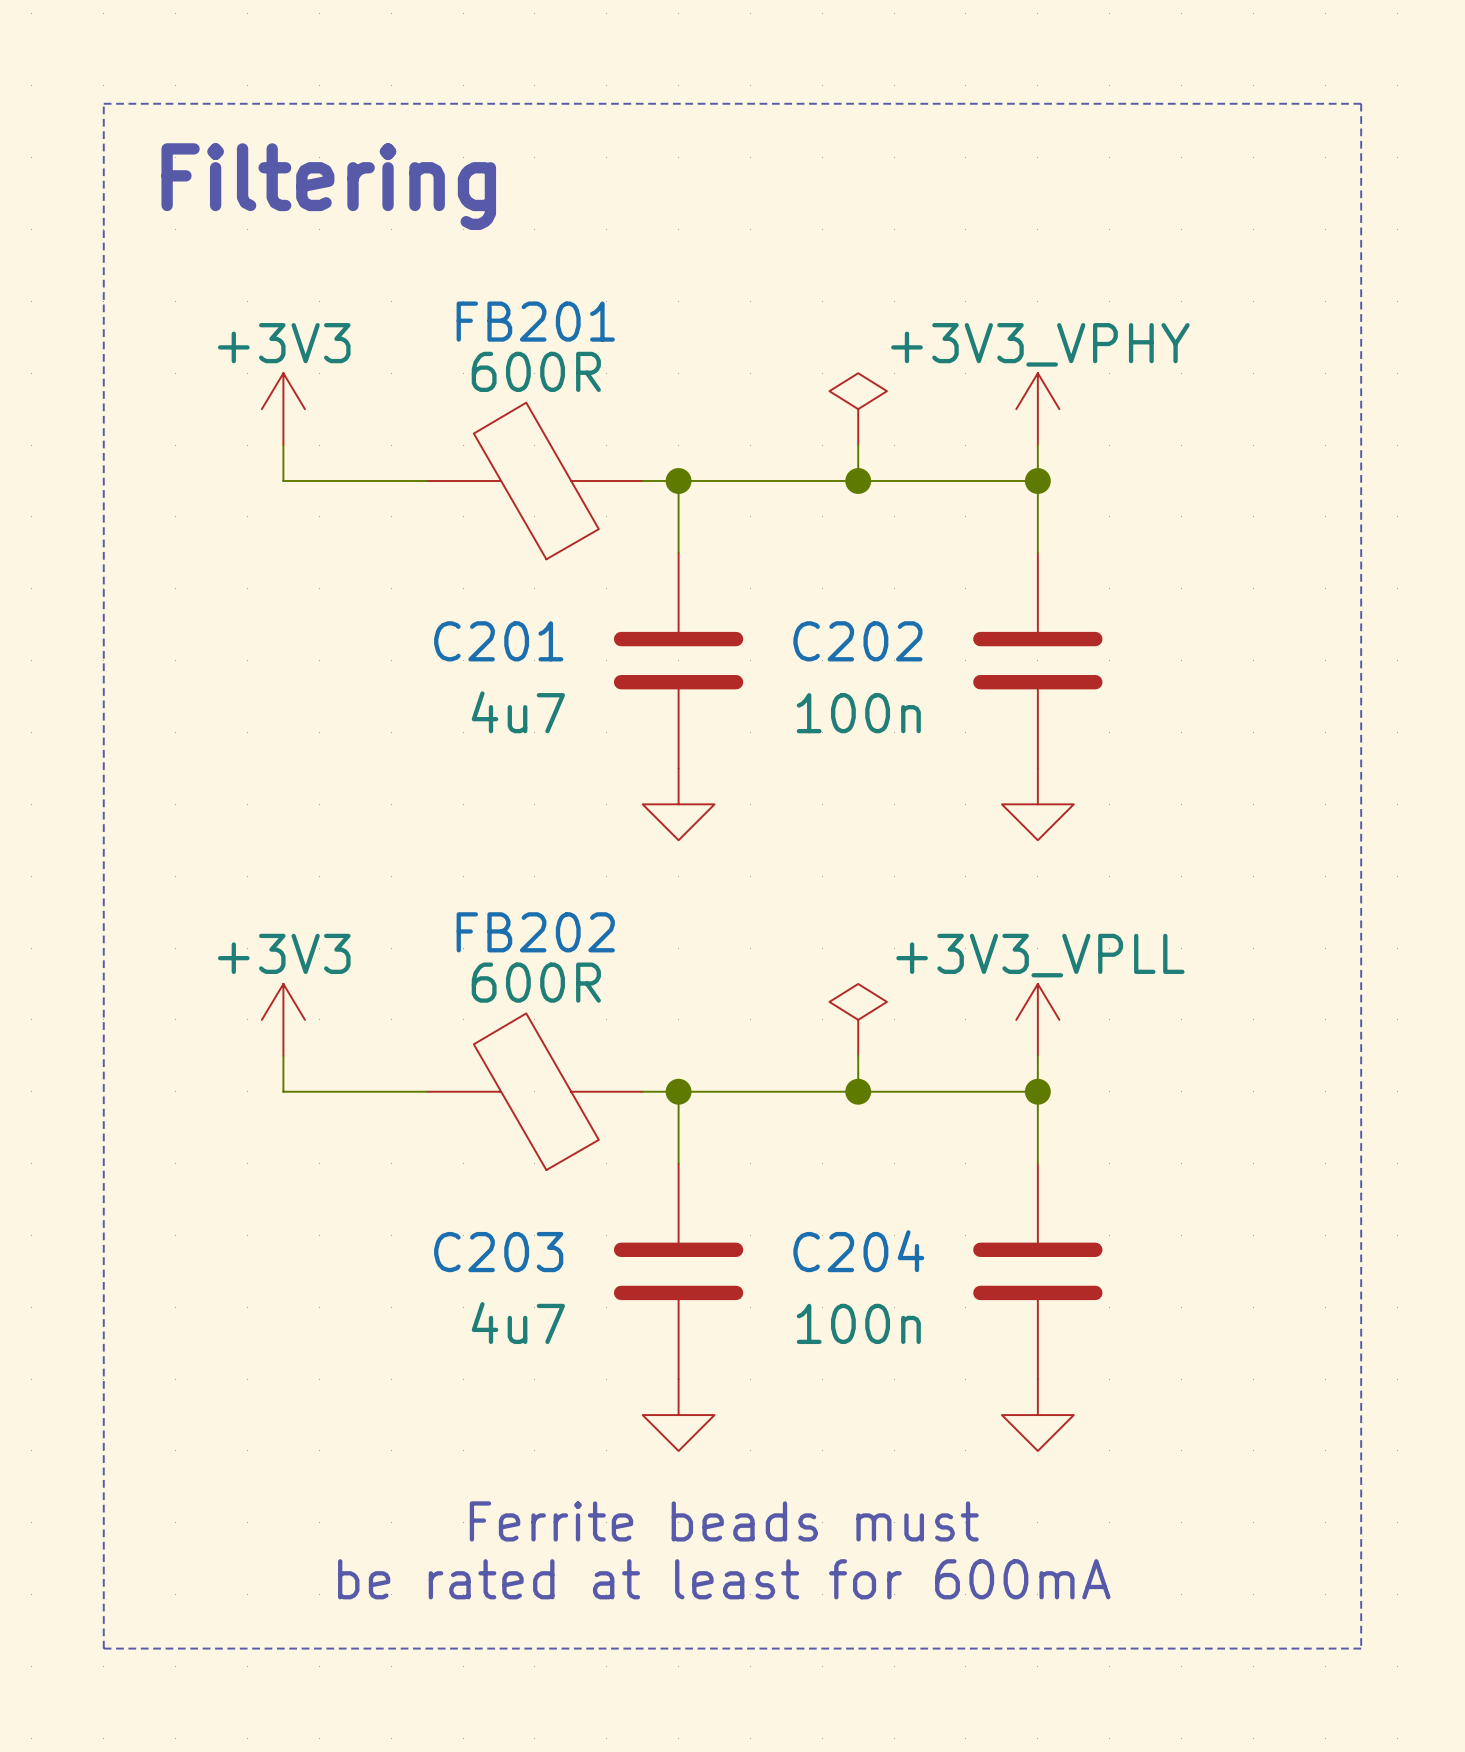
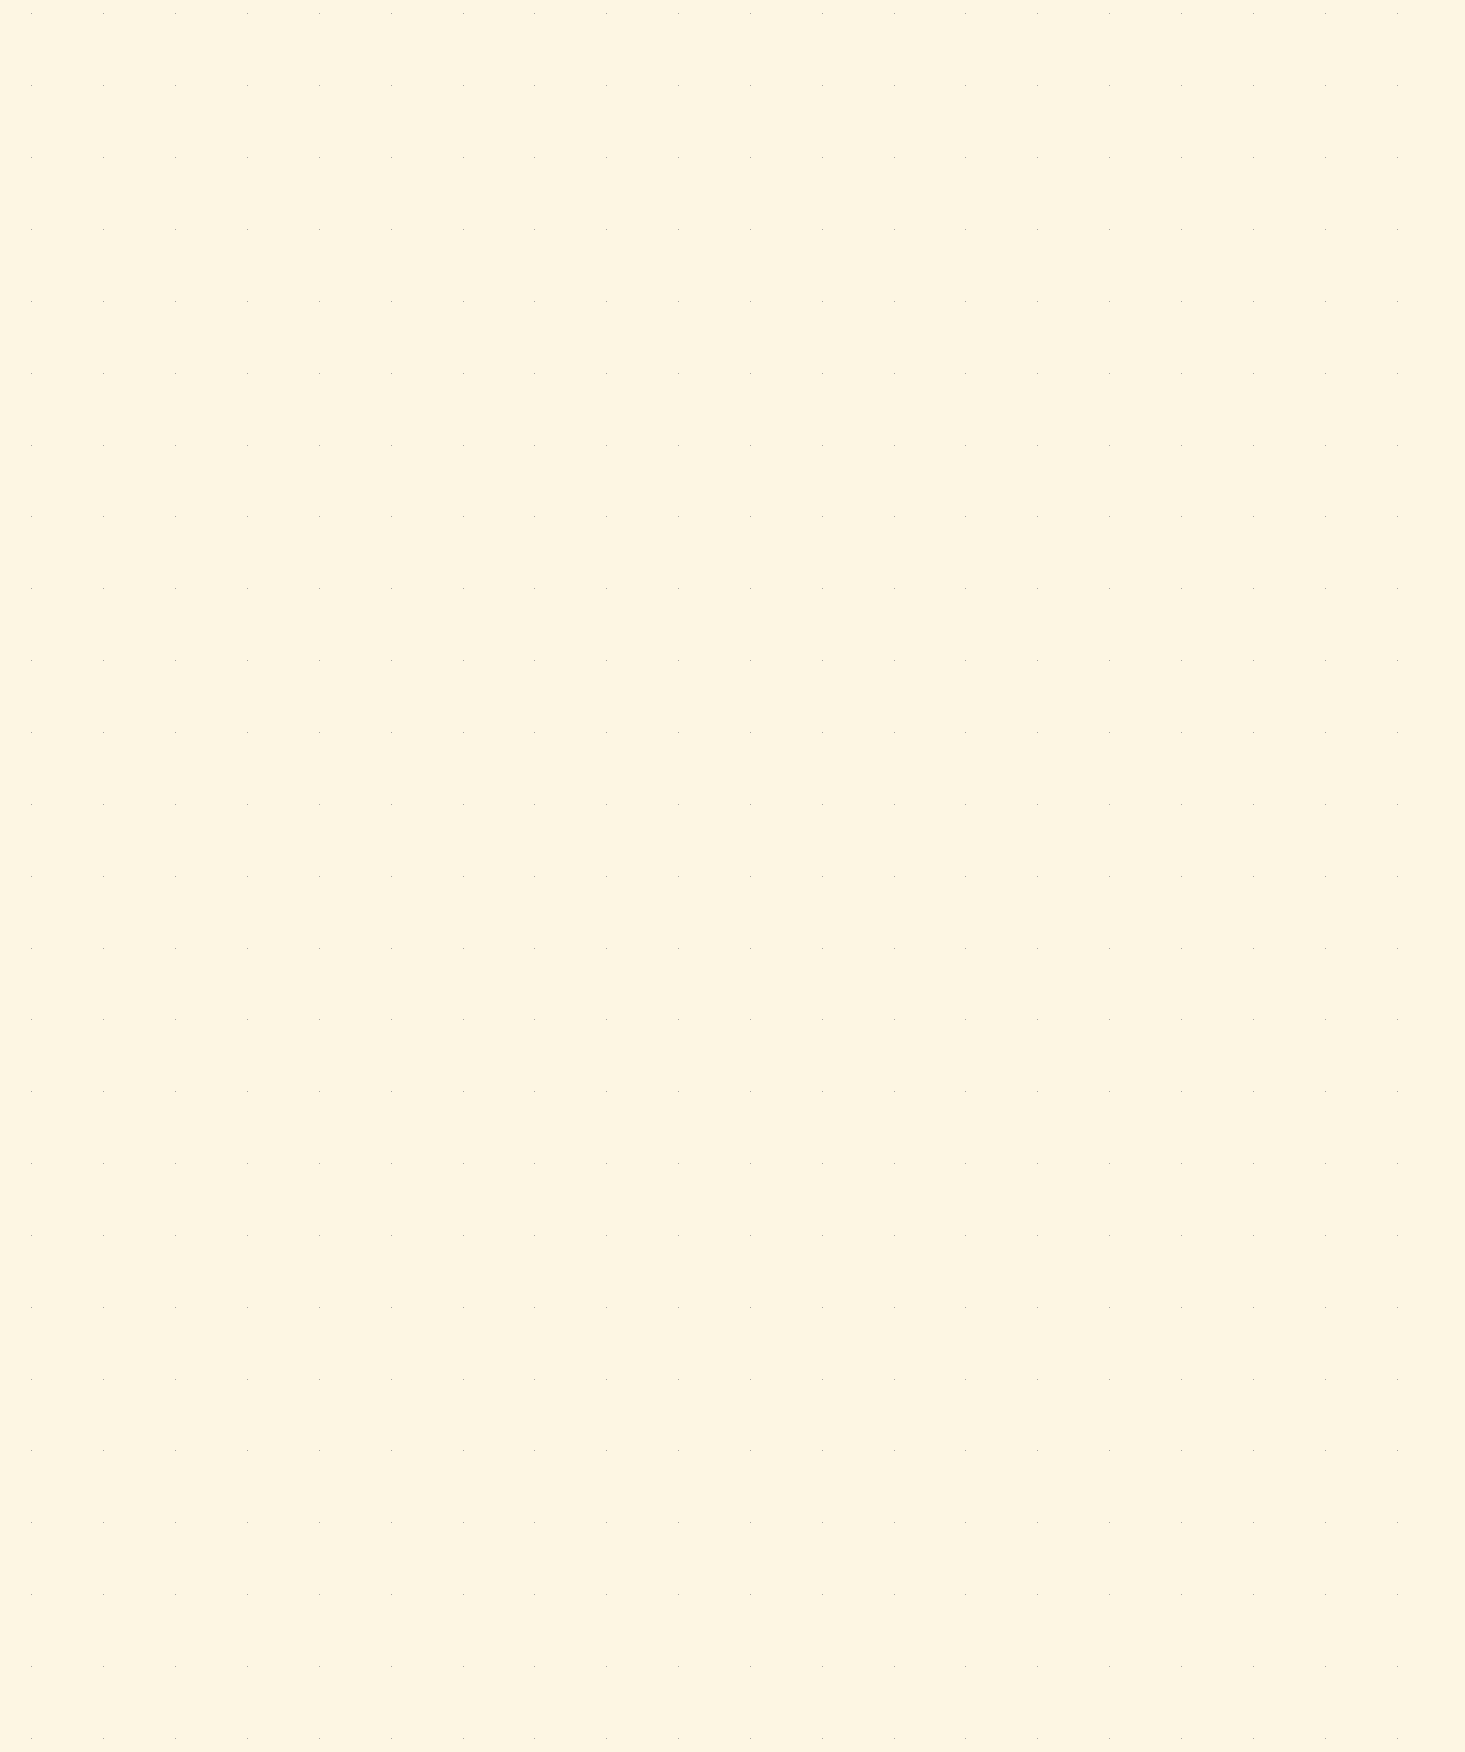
line: (103, 103) (1361, 103) (1361, 1648) (103, 1648) (103, 103) -> none
text: Filtering (328, 186) -> none
power symbol: +3V3 (283, 409) -> none
power symbol: (858, 409) -> none
power symbol: +3V3_VPHY (1037, 409) -> none
wire: (283, 445) (283, 480) (427, 480) -> none
wire: (858, 445) (858, 480) -> none
wire: (1037, 445) (1037, 552) -> none
FB201: 600R (534, 480) -> none
wire: (642, 480) (1037, 480) -> none
wire: (678, 480) (678, 552) -> none
junction: (678, 480) -> none
junction: (858, 480) -> none
junction: (1037, 480) -> none
C201: 4u7 (678, 660) -> none
C202: 100n (1037, 660) -> none
power symbol: (678, 804) -> none
power symbol: (1037, 804) -> none
power symbol: +3V3 (283, 1019) -> none
power symbol: (858, 1019) -> none
power symbol: +3V3_VPLL (1037, 1019) -> none
wire: (283, 1055) (283, 1091) (427, 1091) -> none
wire: (858, 1055) (858, 1091) -> none
wire: (1037, 1055) (1037, 1163) -> none
FB202: 600R (534, 1091) -> none
wire: (642, 1091) (1037, 1091) -> none
wire: (678, 1091) (678, 1163) -> none
junction: (678, 1091) -> none
junction: (858, 1091) -> none
junction: (1037, 1091) -> none
C203: 4u7 (678, 1271) -> none
C204: 100n (1037, 1271) -> none
power symbol: (678, 1415) -> none
power symbol: (1037, 1415) -> none
text: Ferrite beads must (724, 1521) -> none
text: be rated at least for 600mA (724, 1579) -> none

